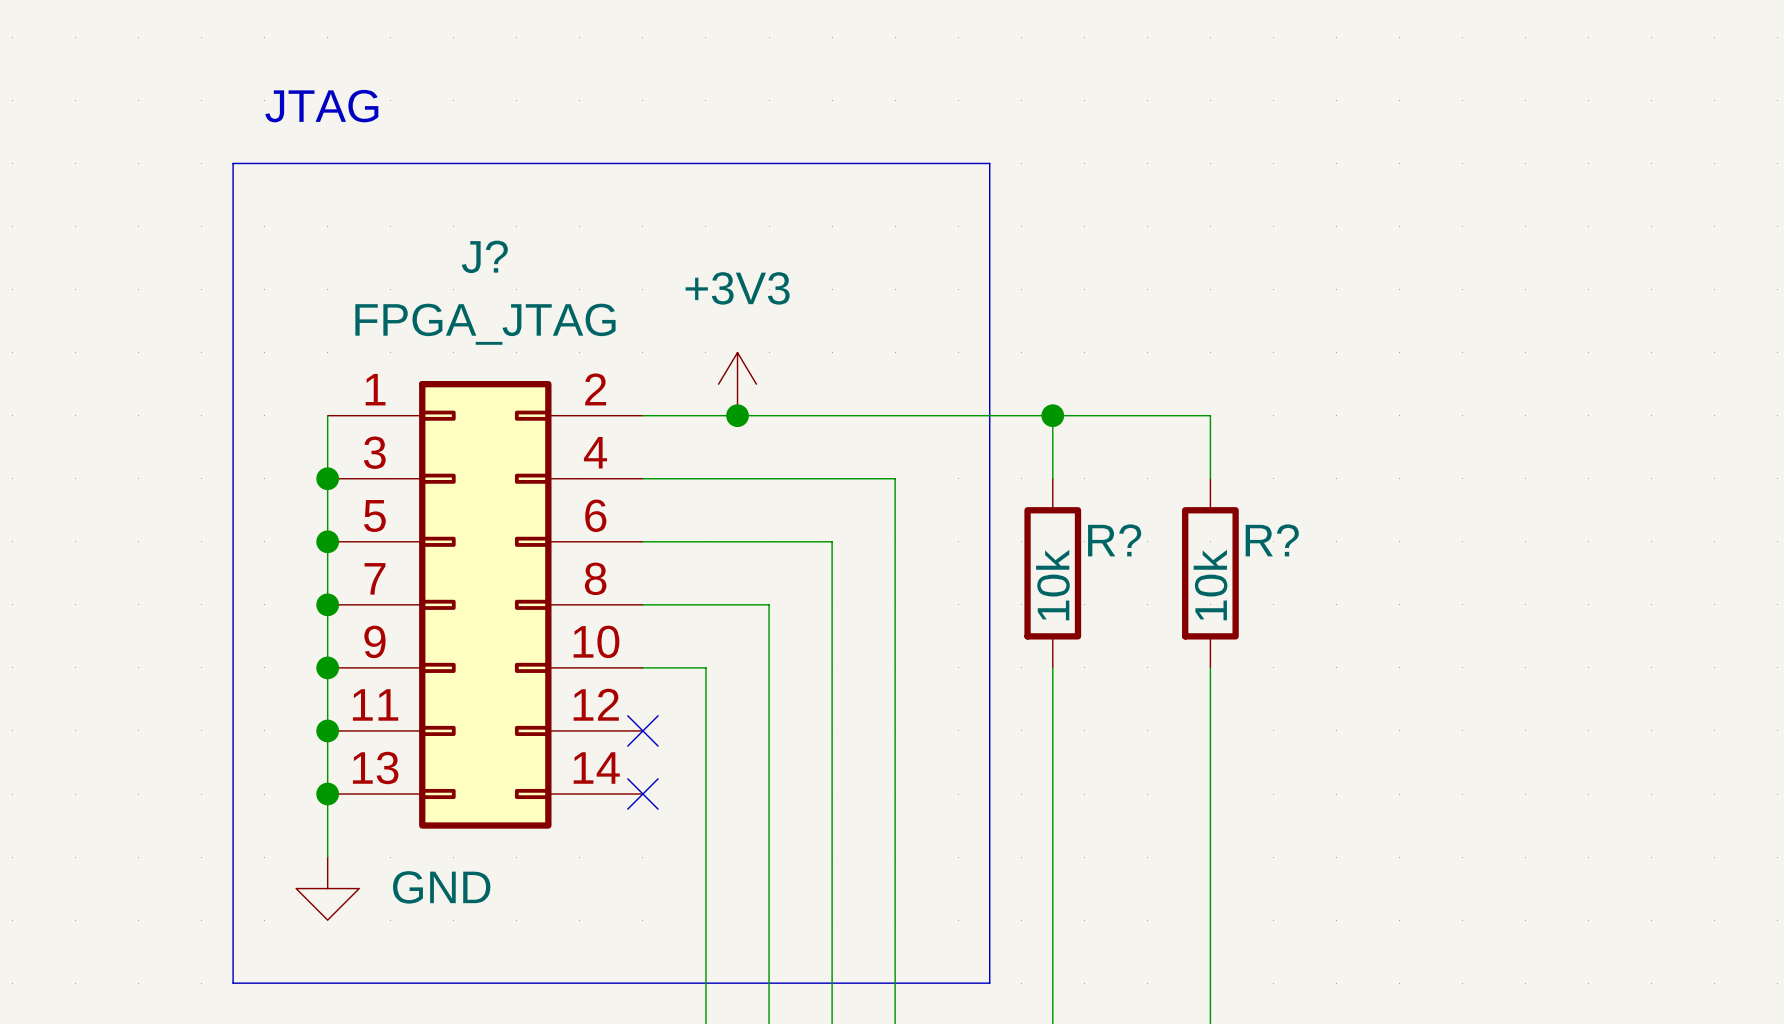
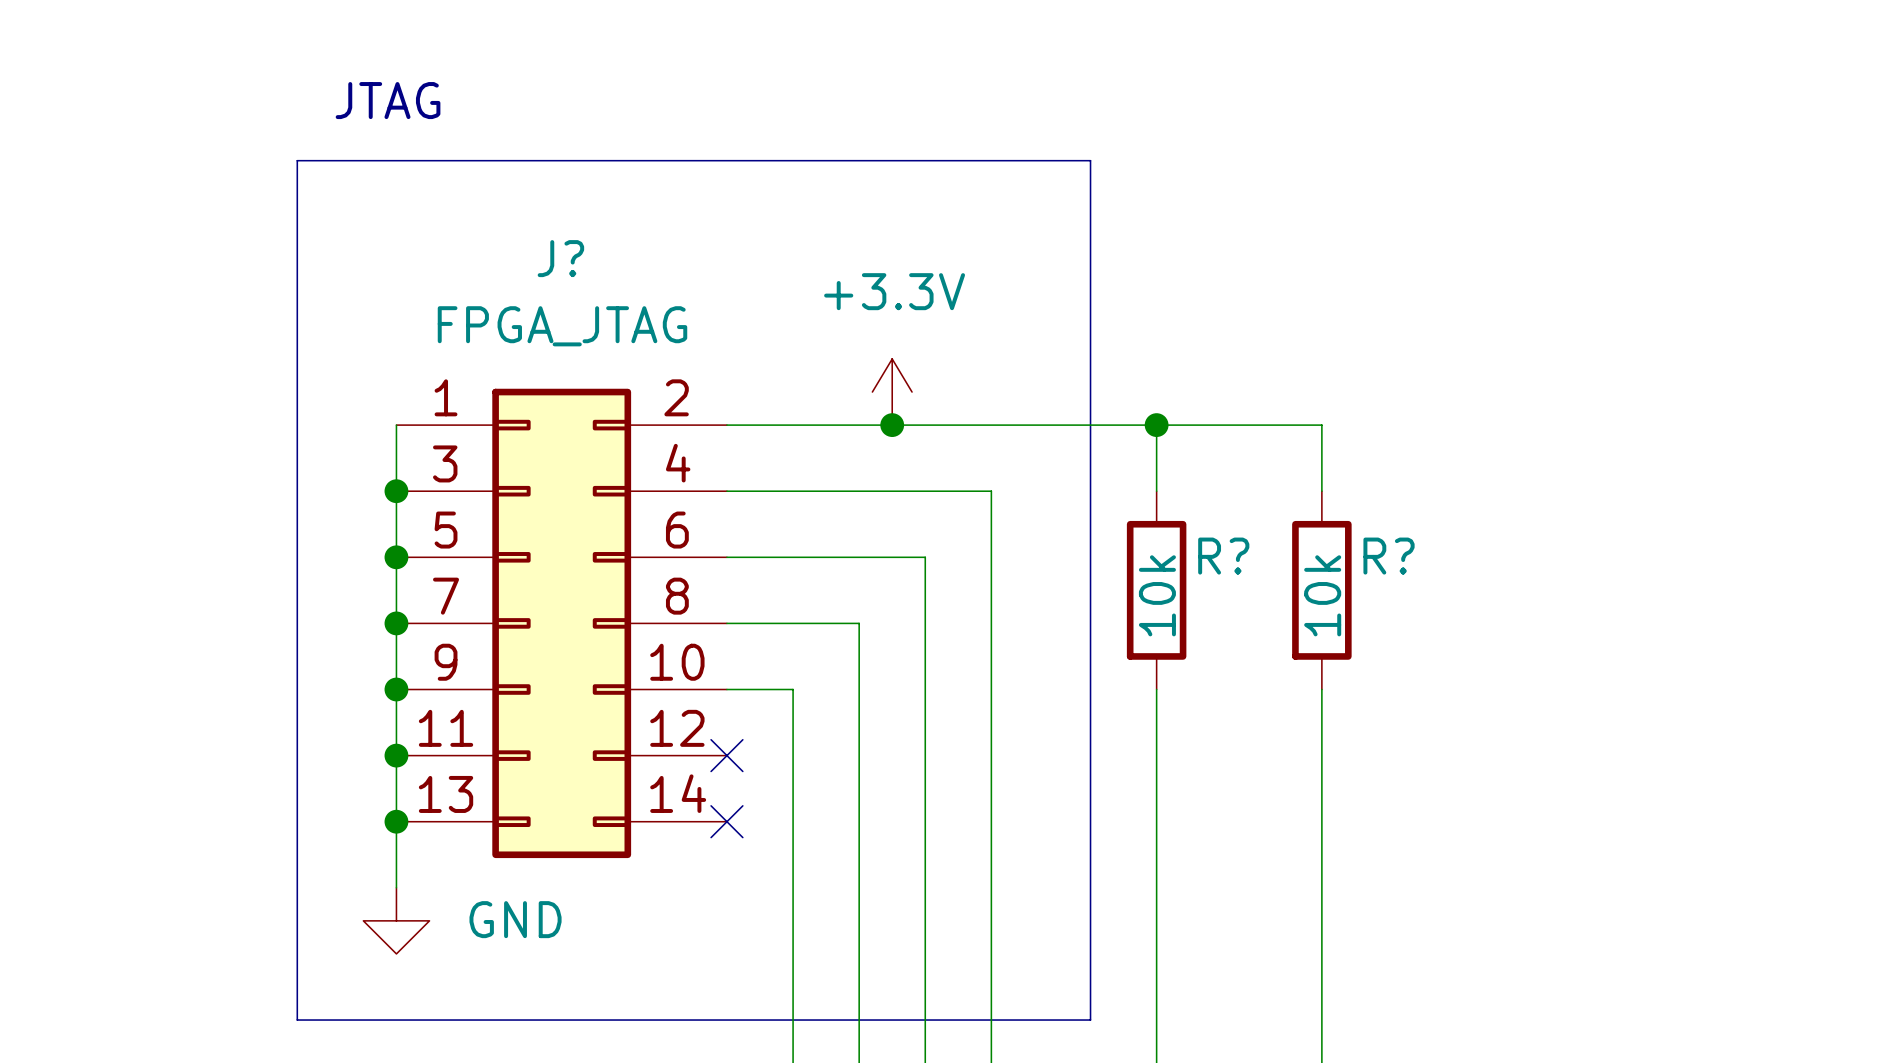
power symbol: +3V3 (737, 384) -> none
power symbol: none -> +3.3V (892, 392)
junction position: (737, 415) -> (892, 425)

